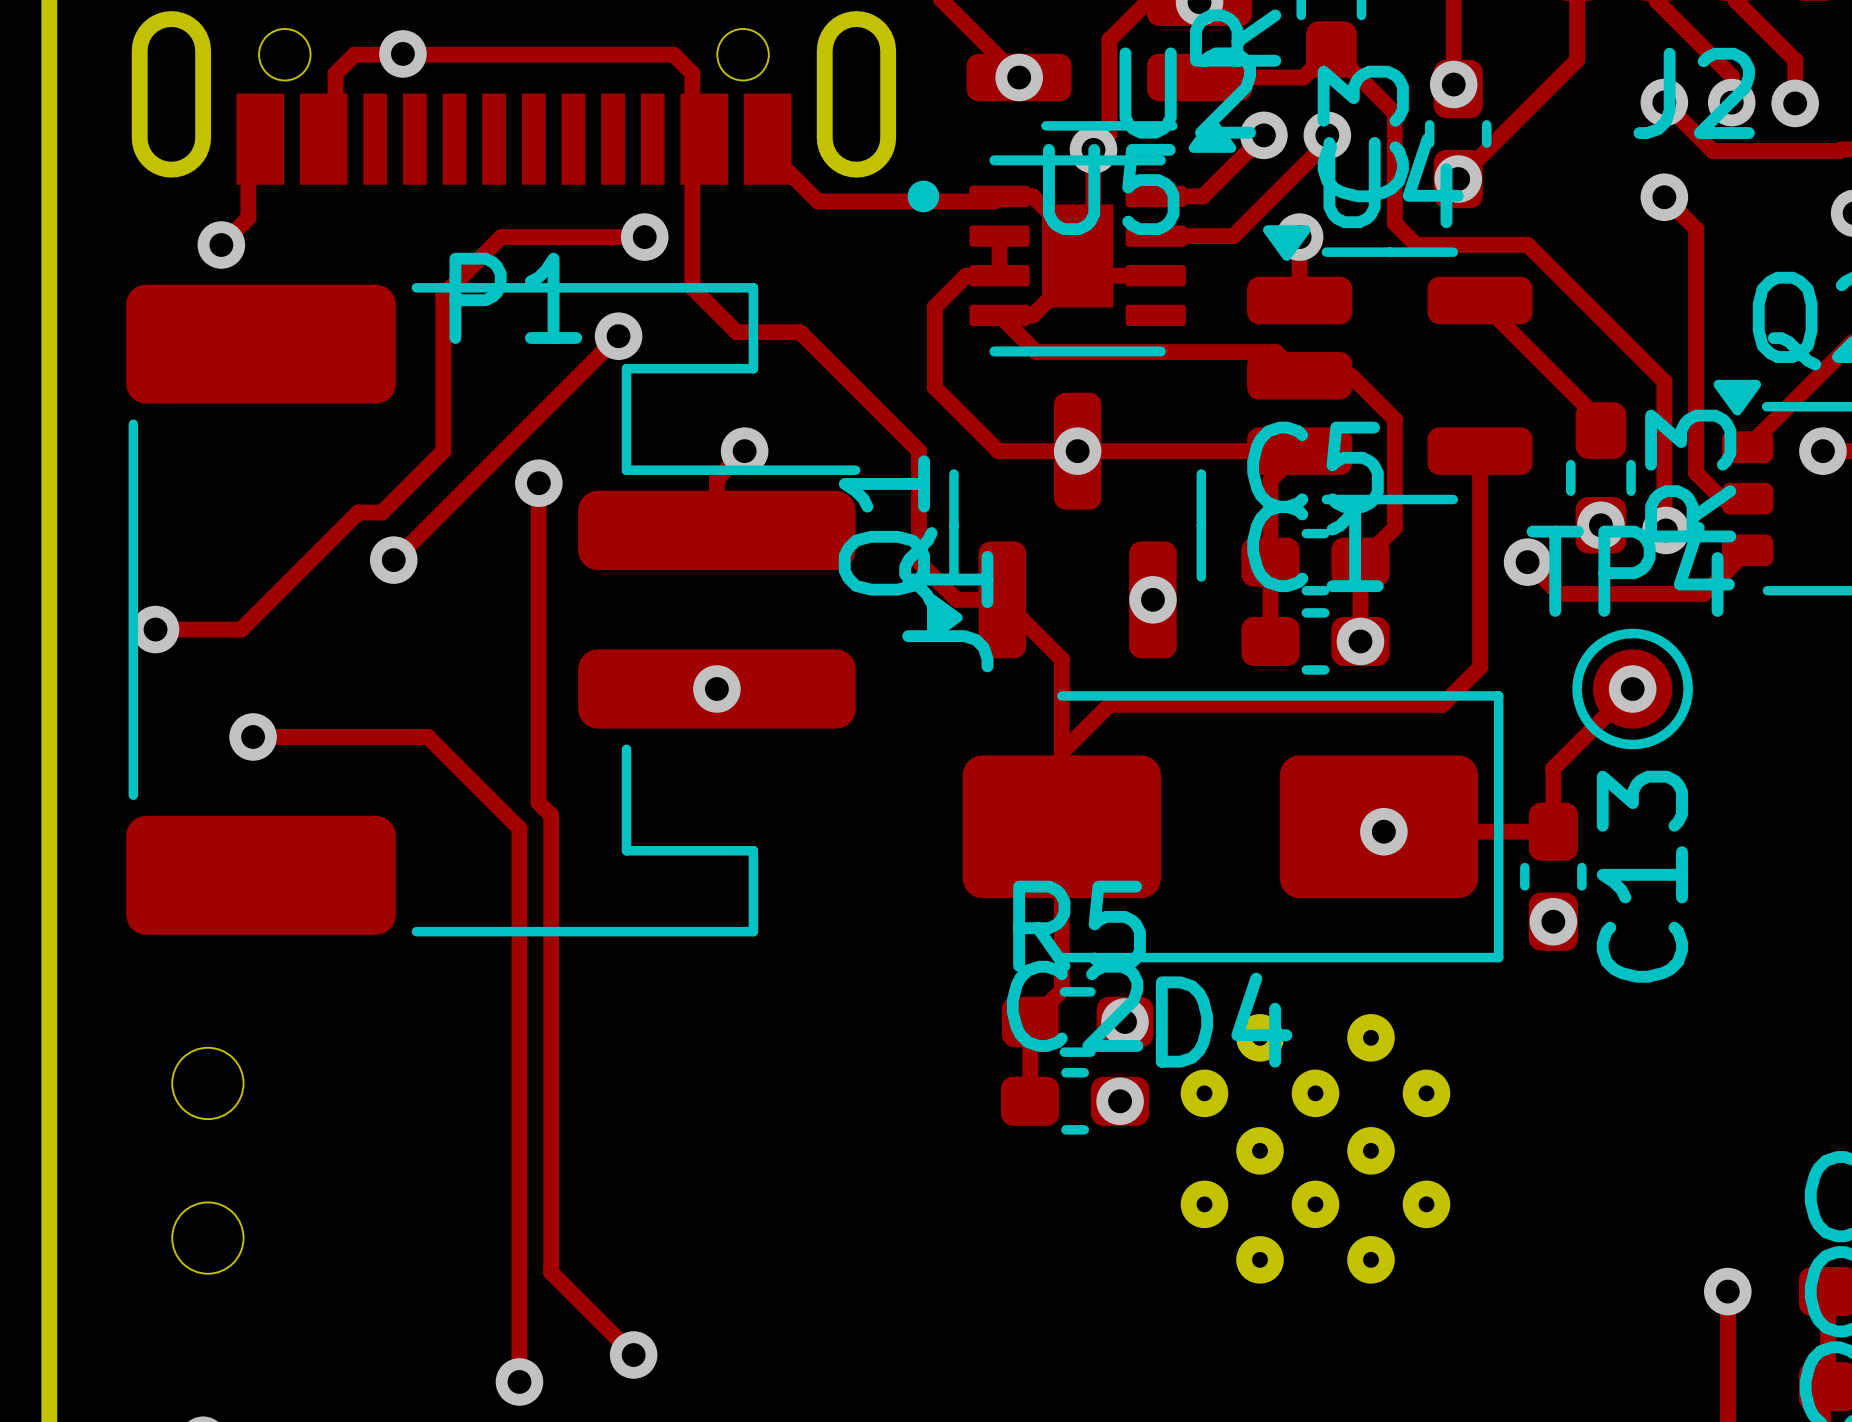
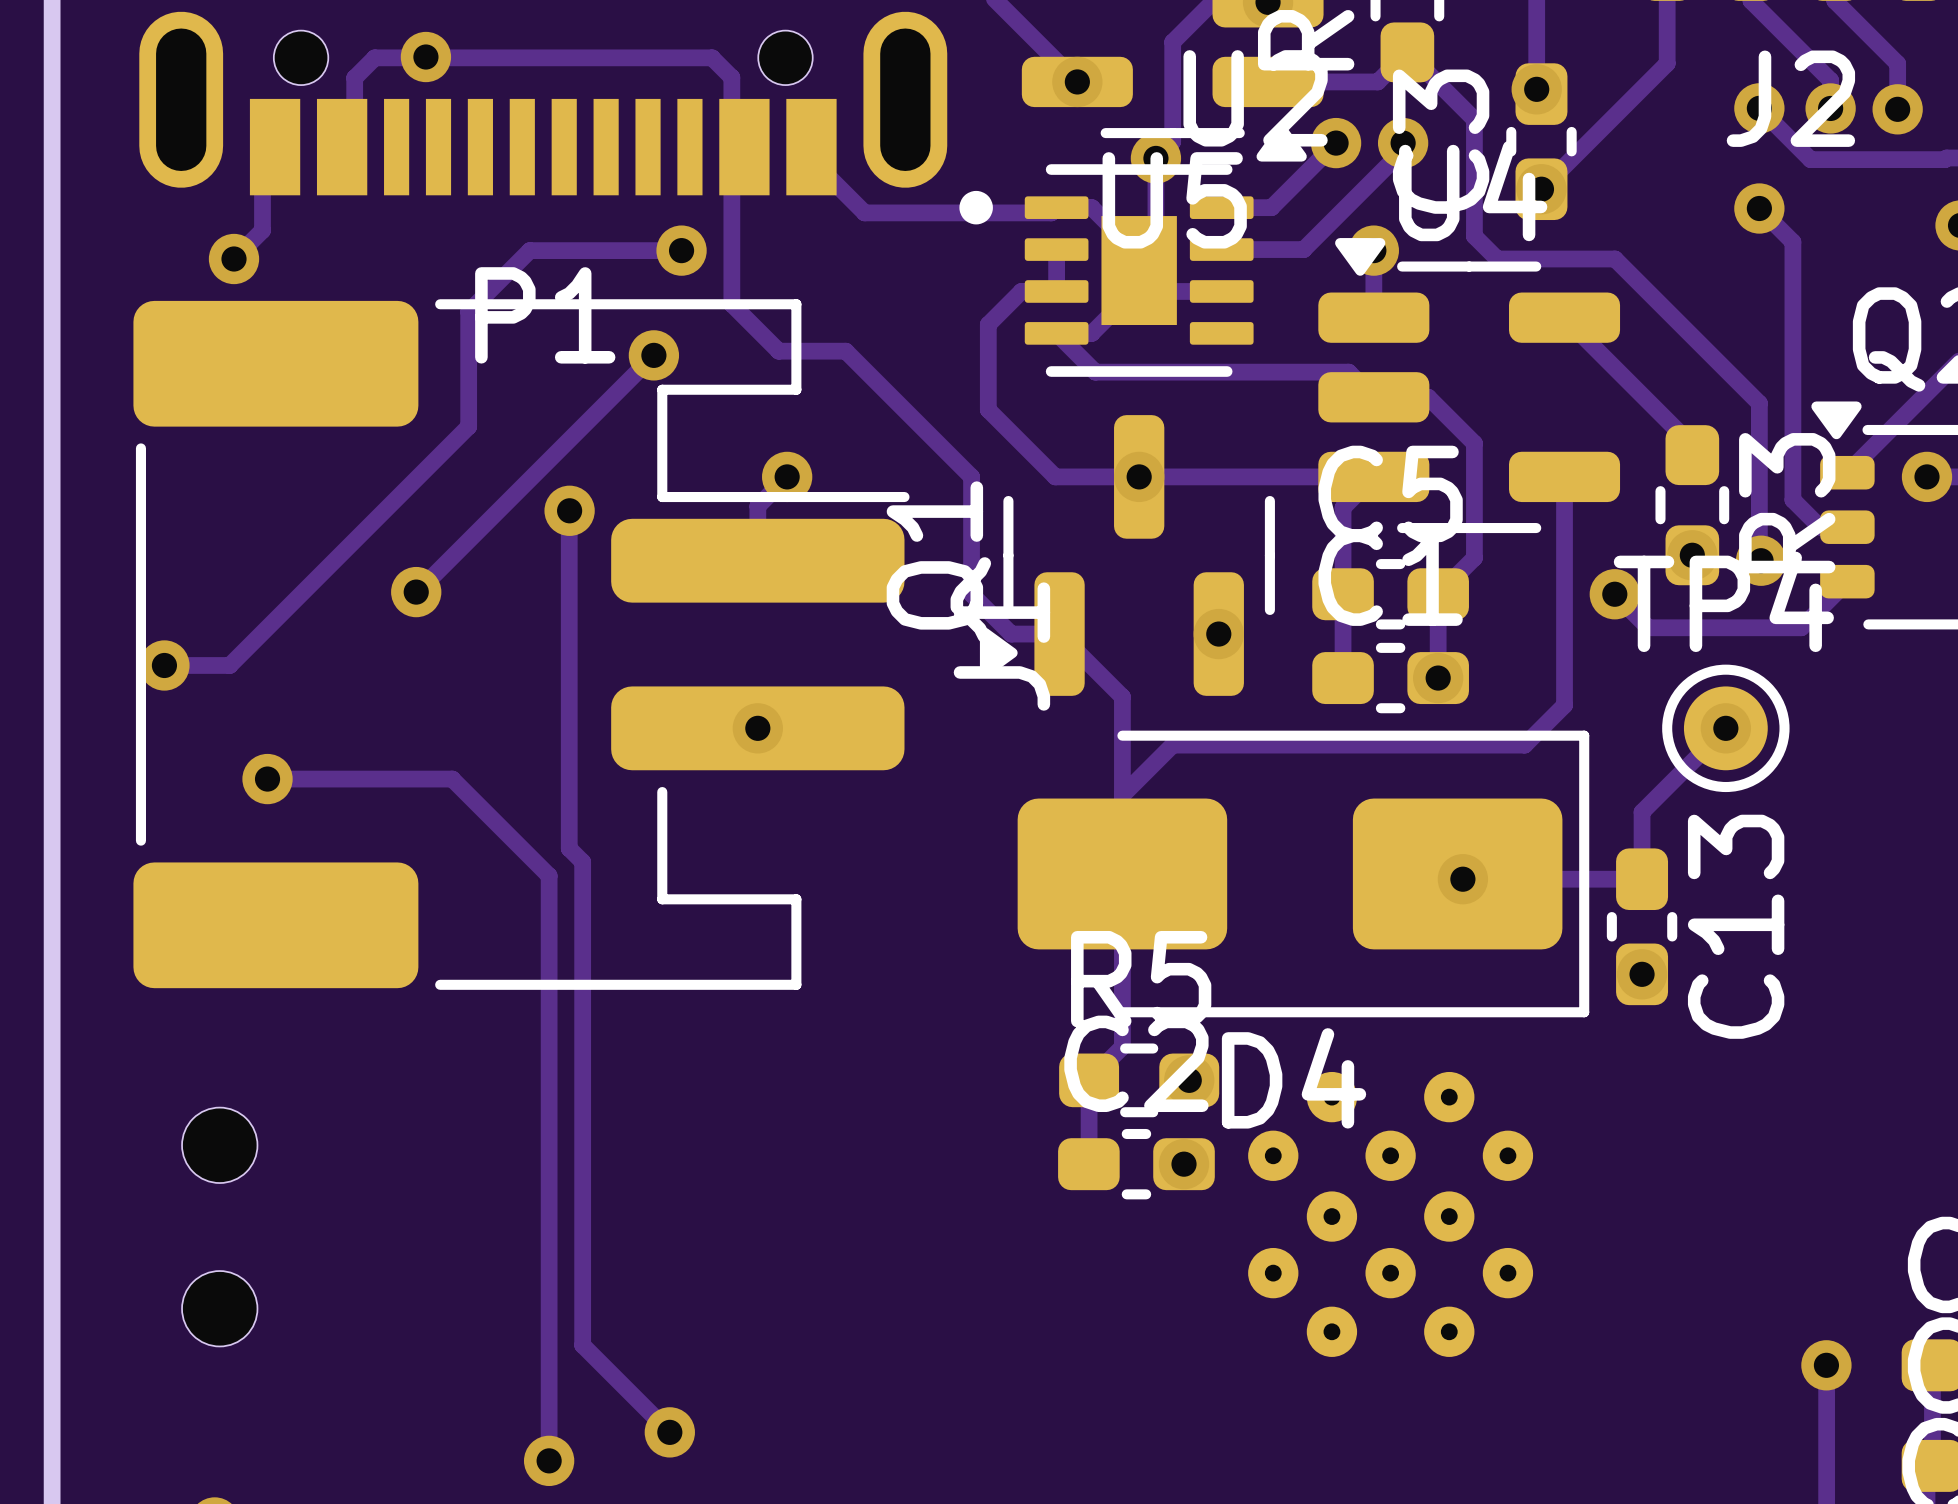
track: (443, 403) (443, 451) (381, 512) (358, 512) (241, 629) (217, 629) -> (468, 426) (229, 665)

